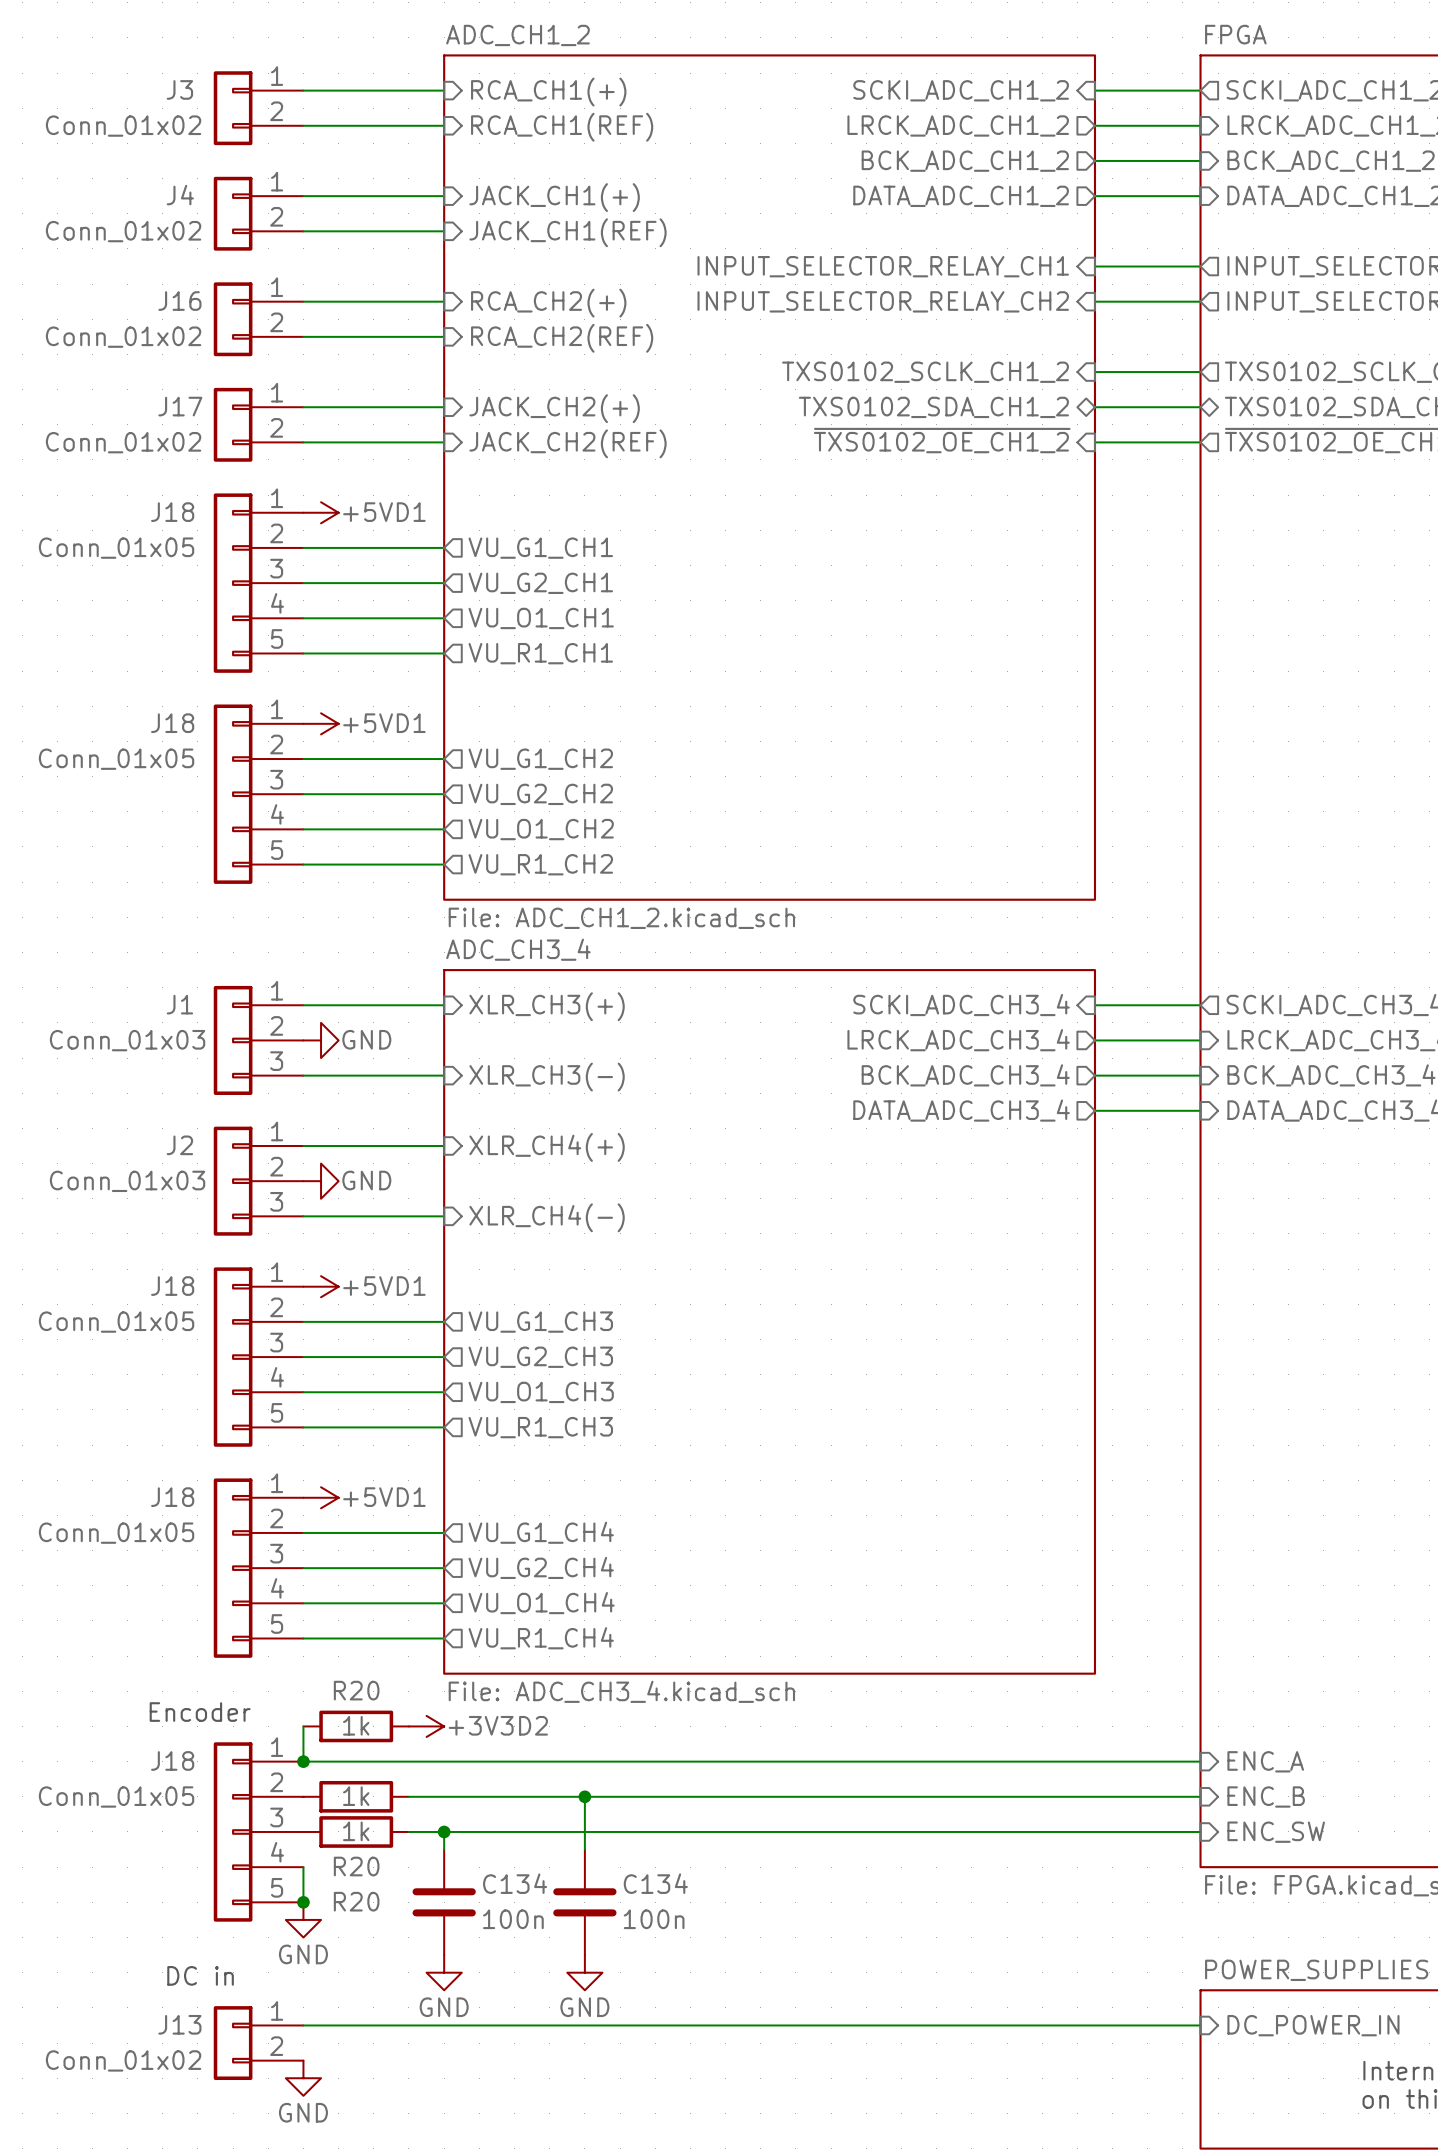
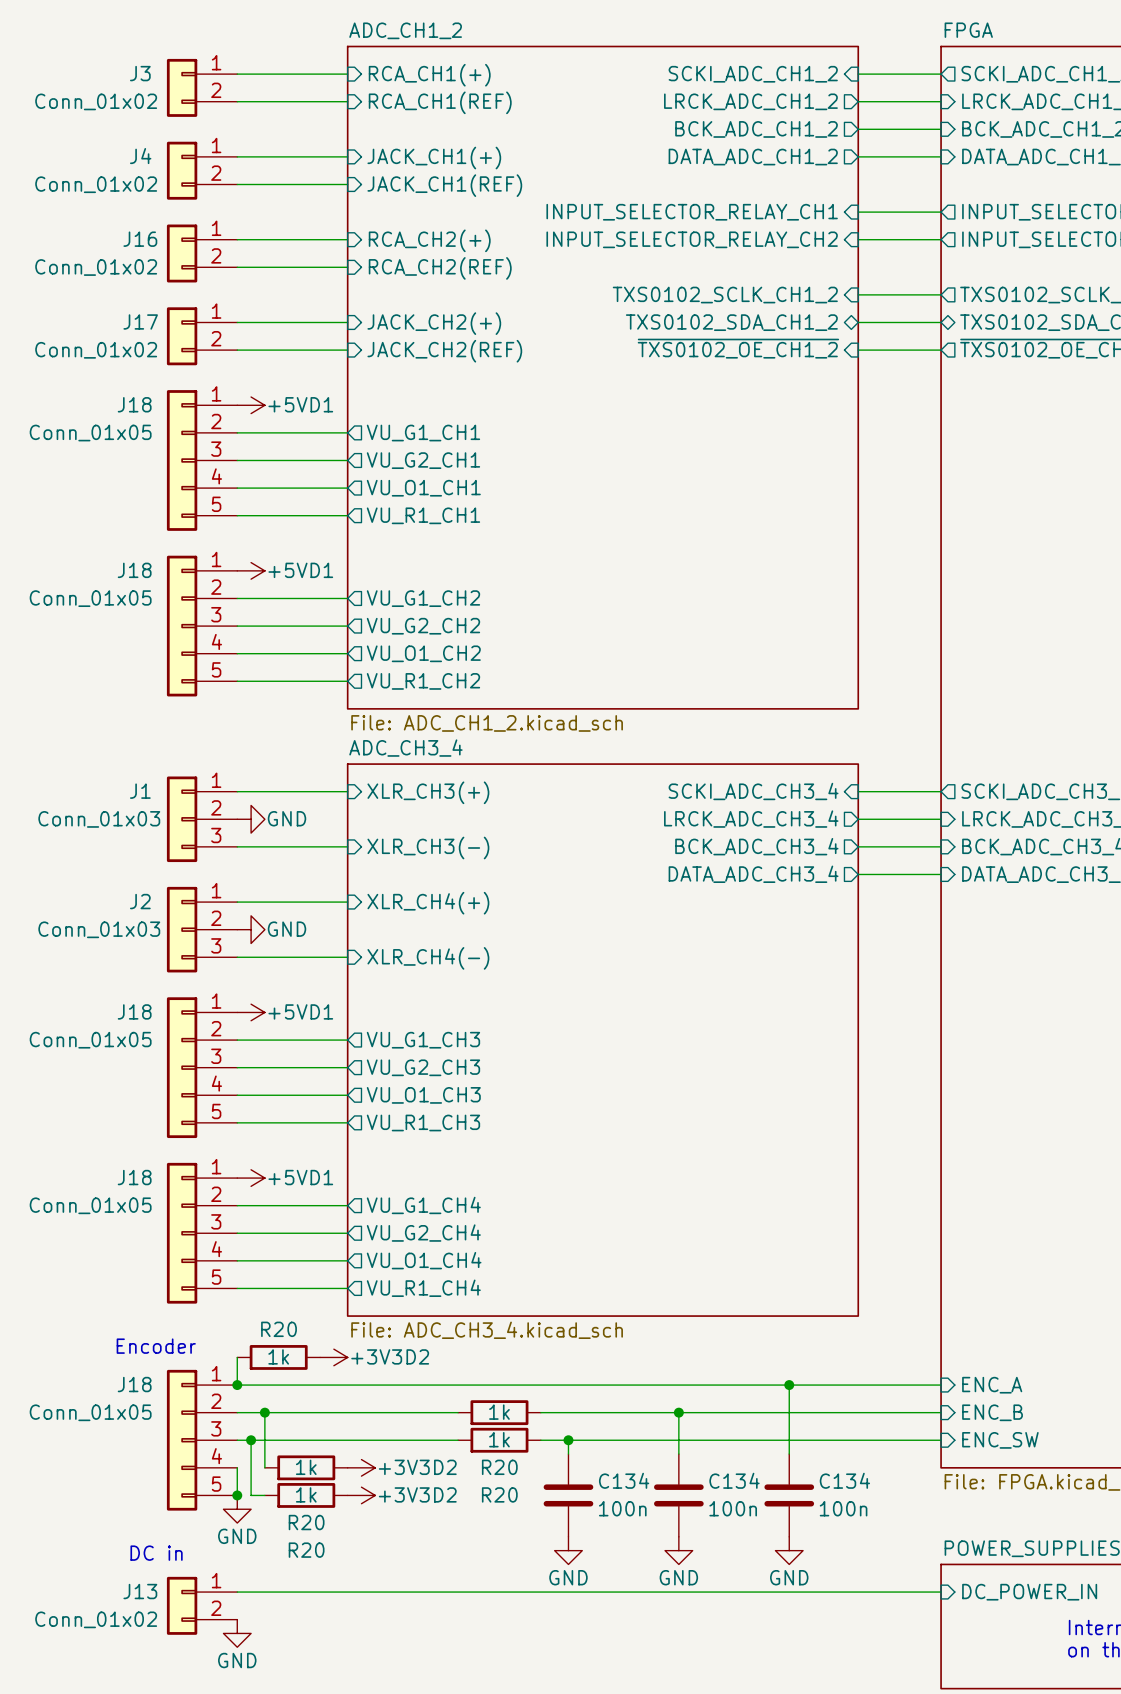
wire: none -> (789, 1385) (789, 1454)
junction: none -> (789, 1385)
wire: none -> (237, 1412) (320, 1412)
wire: none -> (264, 1412) (264, 1467)
junction: none -> (264, 1412)
R20: 1k (356, 1796) -> none
junction: (584, 1796) -> none
R20: none -> 1k (499, 1412)
wire: (690, 1796) (584, 1796) (584, 1849) -> none
wire: none -> (678, 1412) (678, 1454)
junction: none -> (678, 1412)
wire: none -> (251, 1440) (251, 1495) (264, 1495)
junction: none -> (251, 1440)
R20: 1k (356, 1831) -> none
wire: (444, 1831) (444, 1849) -> (568, 1440) (568, 1454)
junction: (444, 1831) -> none
wire: (584, 1831) (690, 1831) -> (237, 1440) (320, 1440)
R20: none -> 1k (499, 1440)
junction: none -> (568, 1440)
R20: none -> 1k (306, 1467)
power symbol: none -> +3V3D2 (361, 1467)
R20: none -> 1k (306, 1495)
C134: 100n (444, 1902) -> none
power symbol: none -> +3V3D2 (361, 1495)
C134: 100n (584, 1902) -> none
C134: none -> 100n (568, 1495)
C134: none -> 100n (678, 1495)
C134: none -> 100n (789, 1495)
power symbol: GND (444, 1972) -> none
power symbol: GND (584, 1972) -> none
power symbol: none -> GND (568, 1550)
power symbol: none -> GND (678, 1550)
power symbol: none -> GND (789, 1550)

